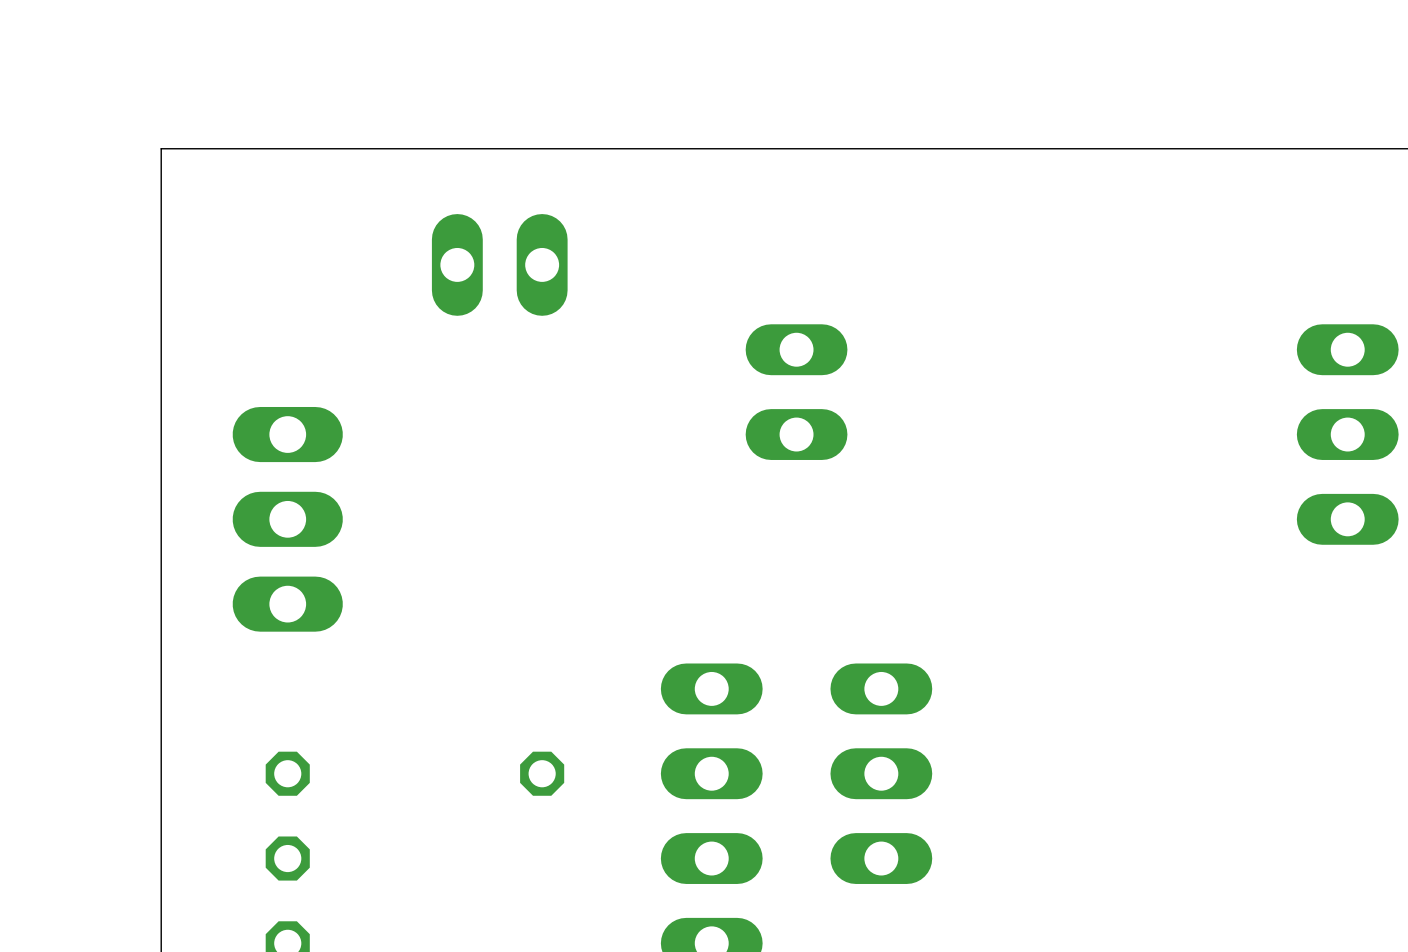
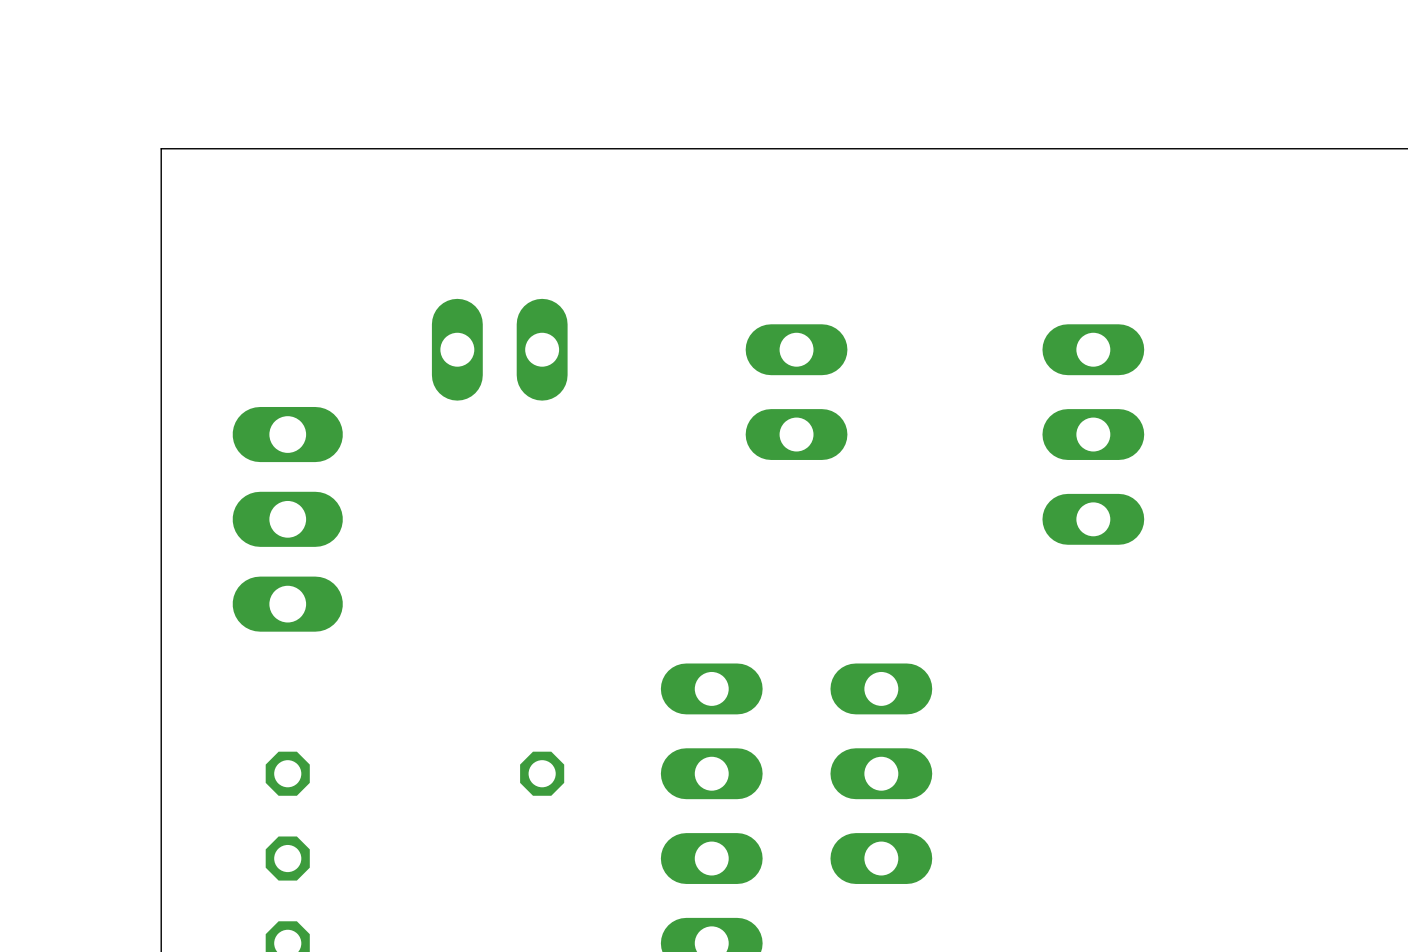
part position: (499, 264) -> (499, 349)
part position: (1347, 434) -> (1093, 434)

